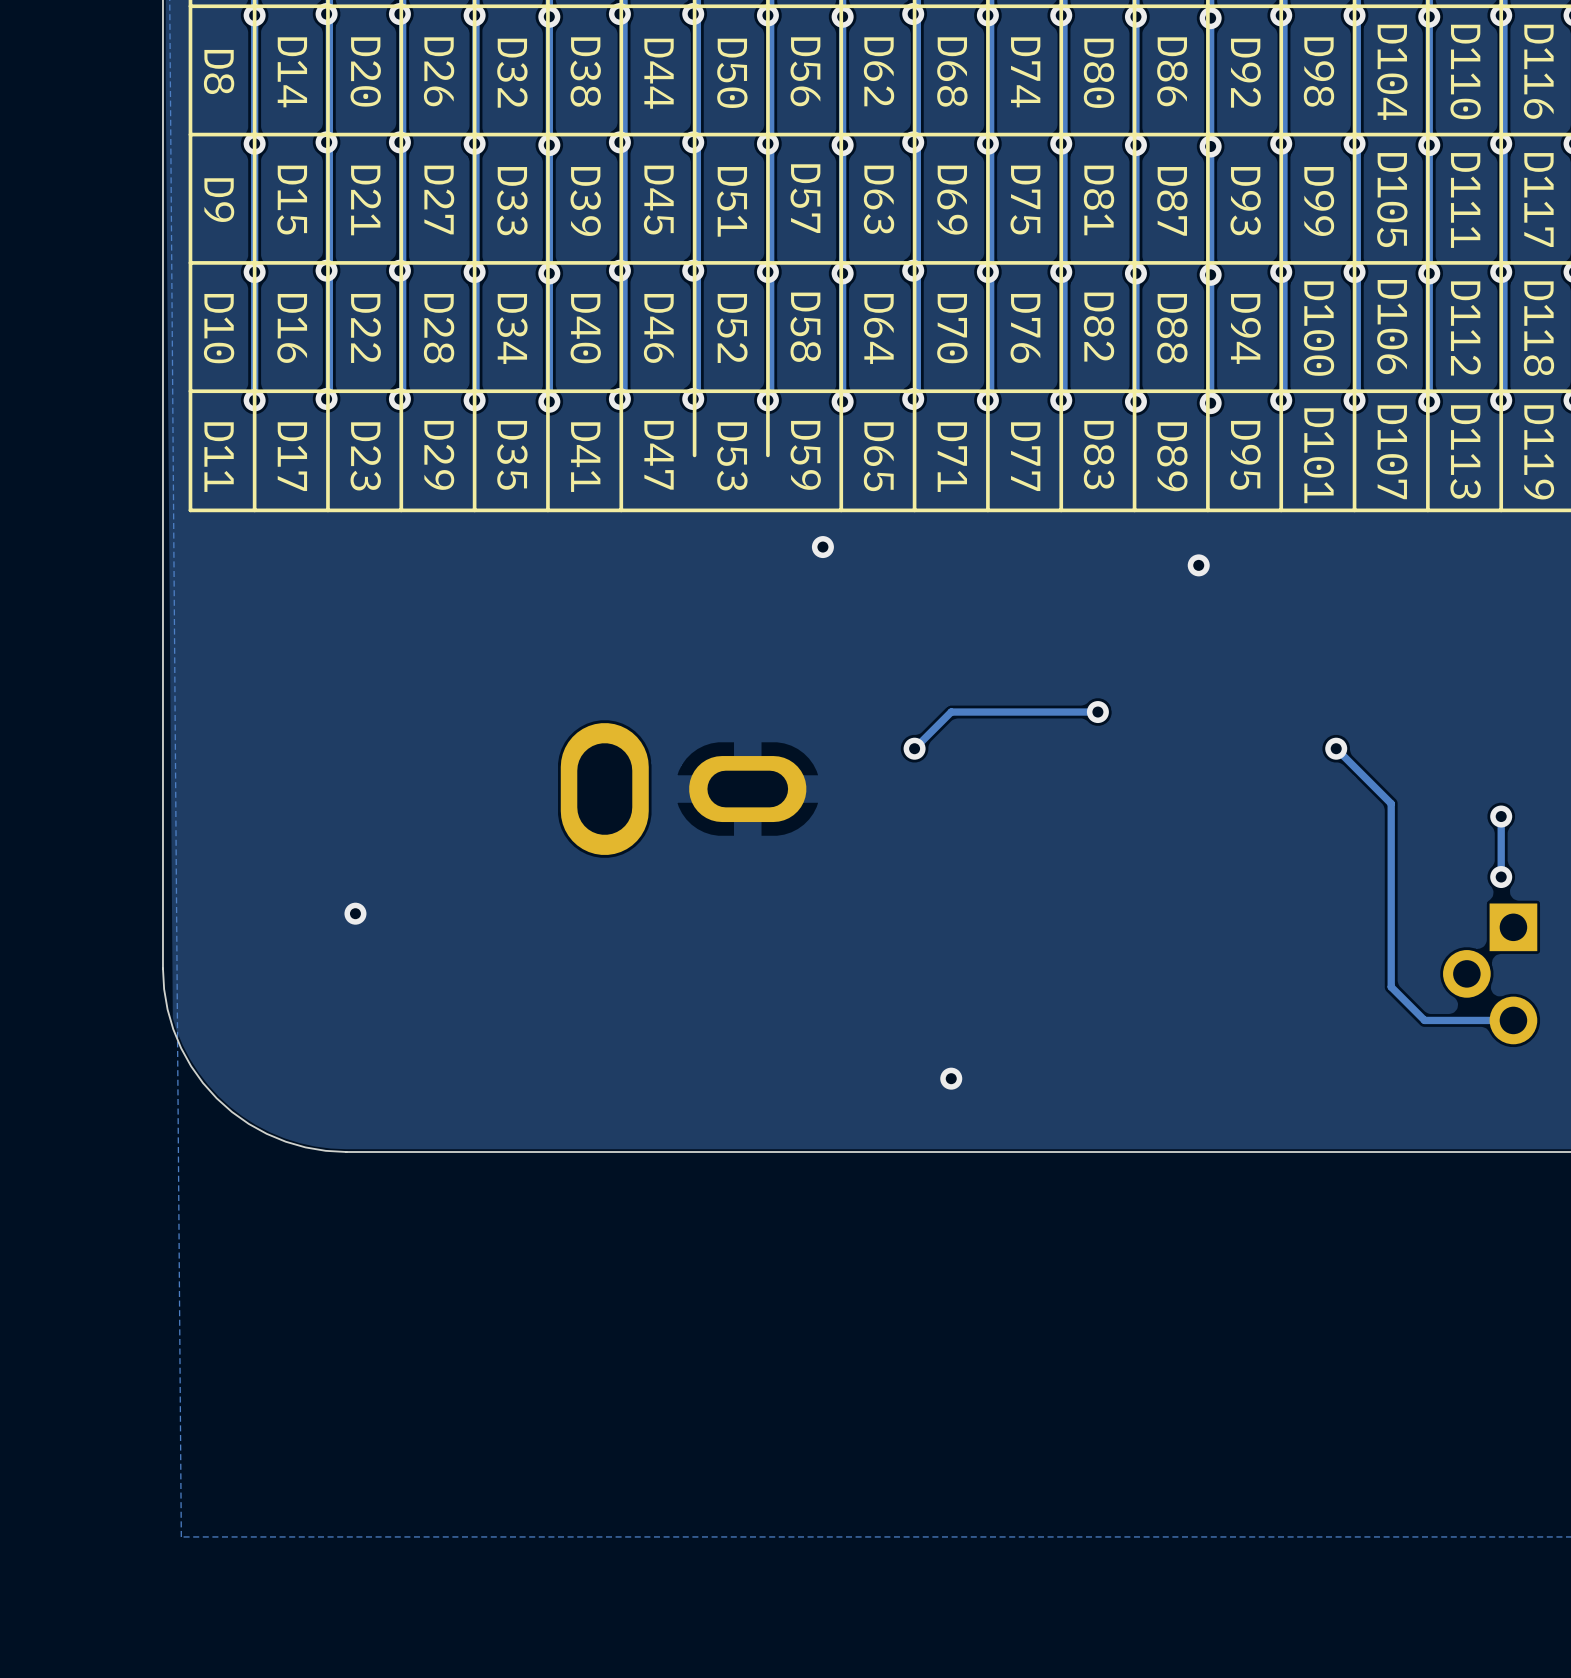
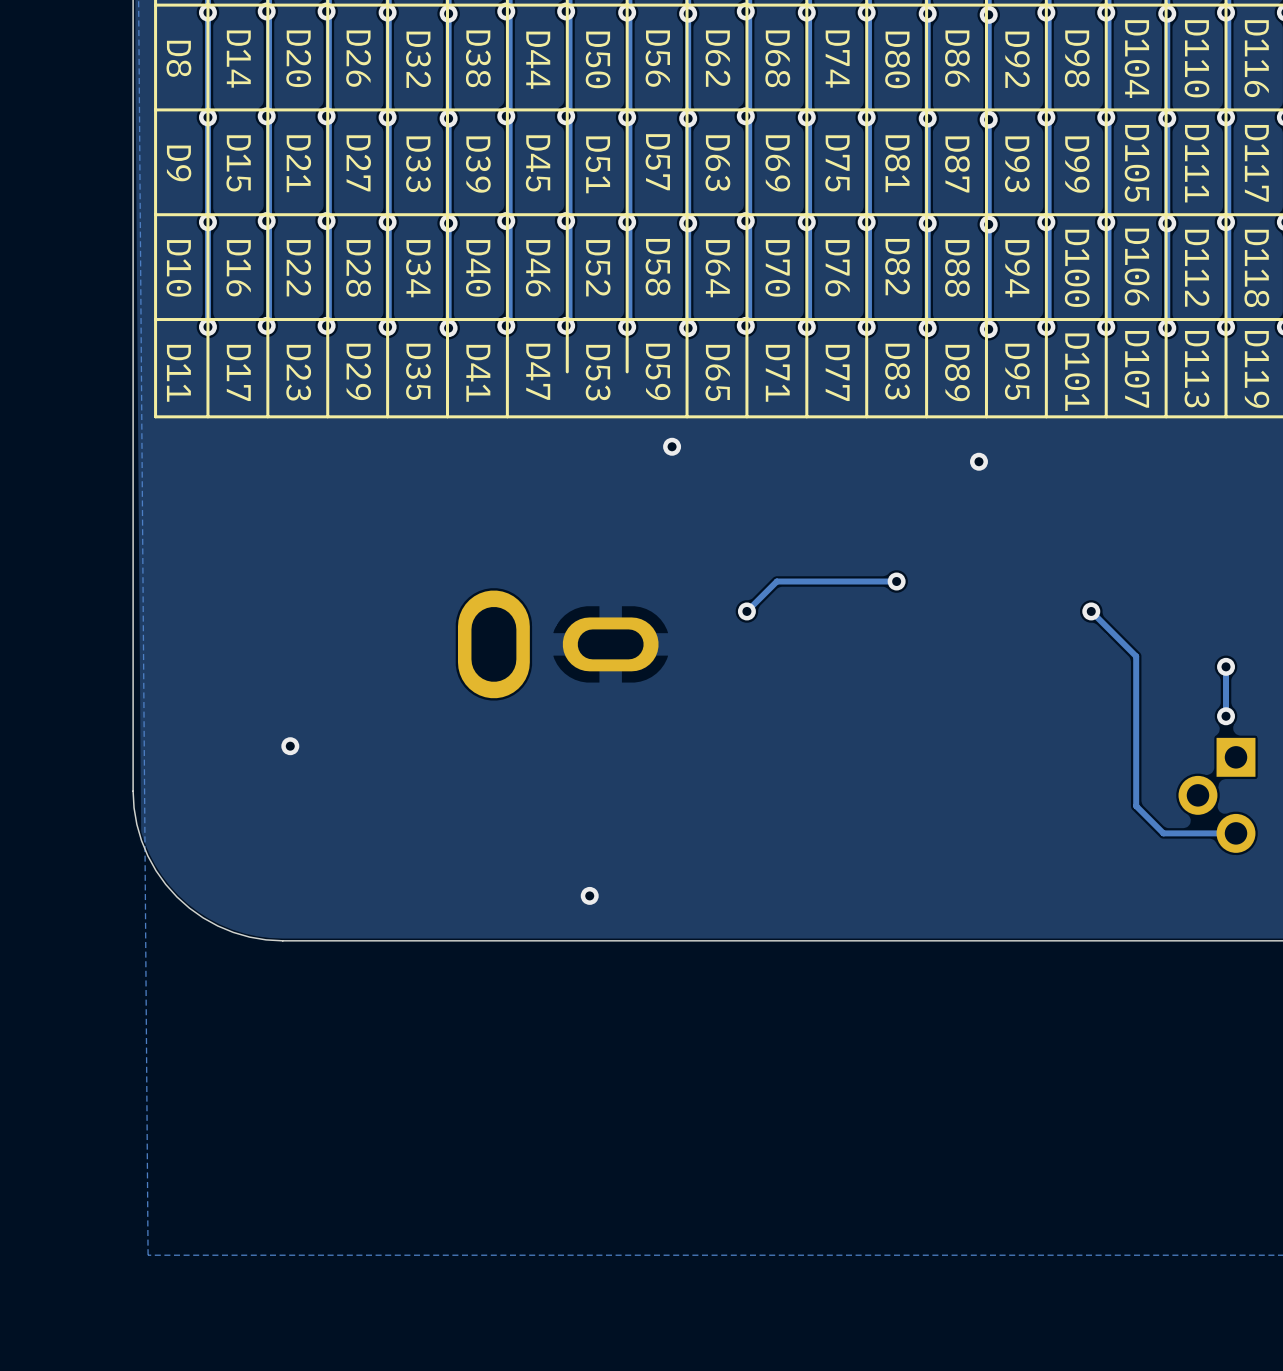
via: (951, 1078) -> none
via: none -> (589, 895)

